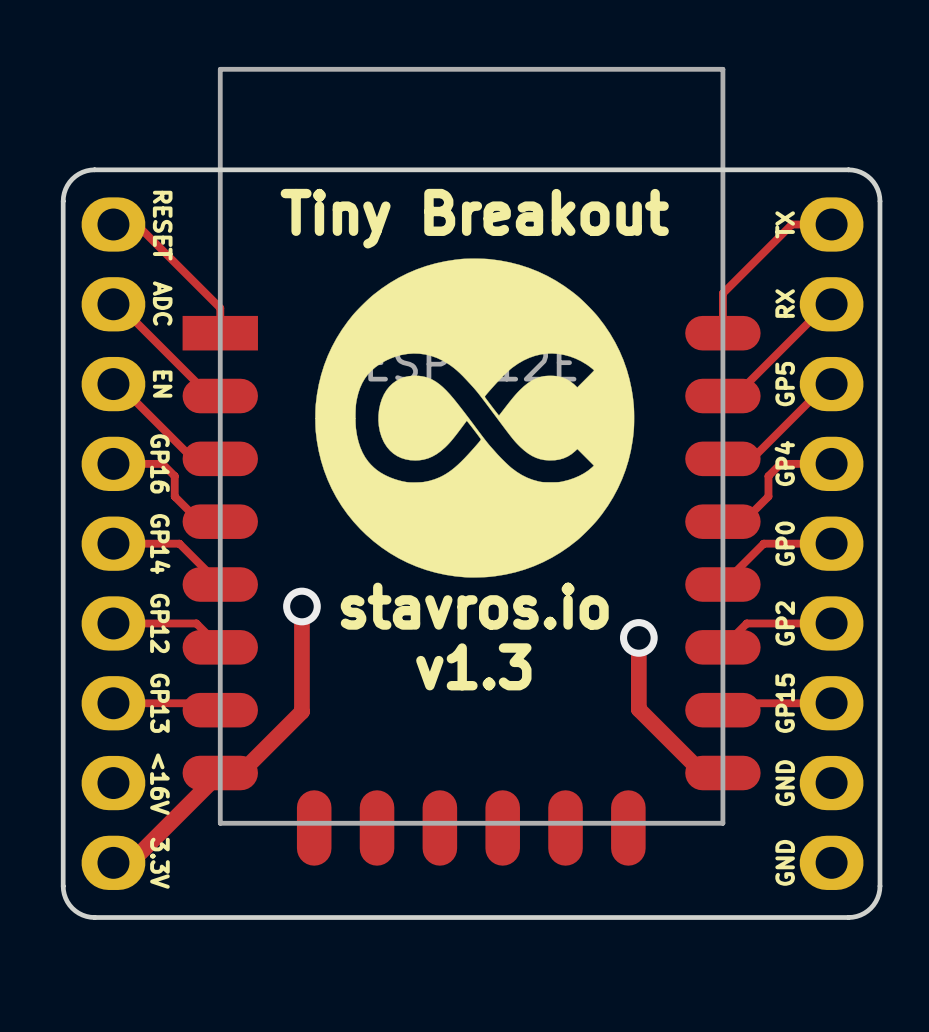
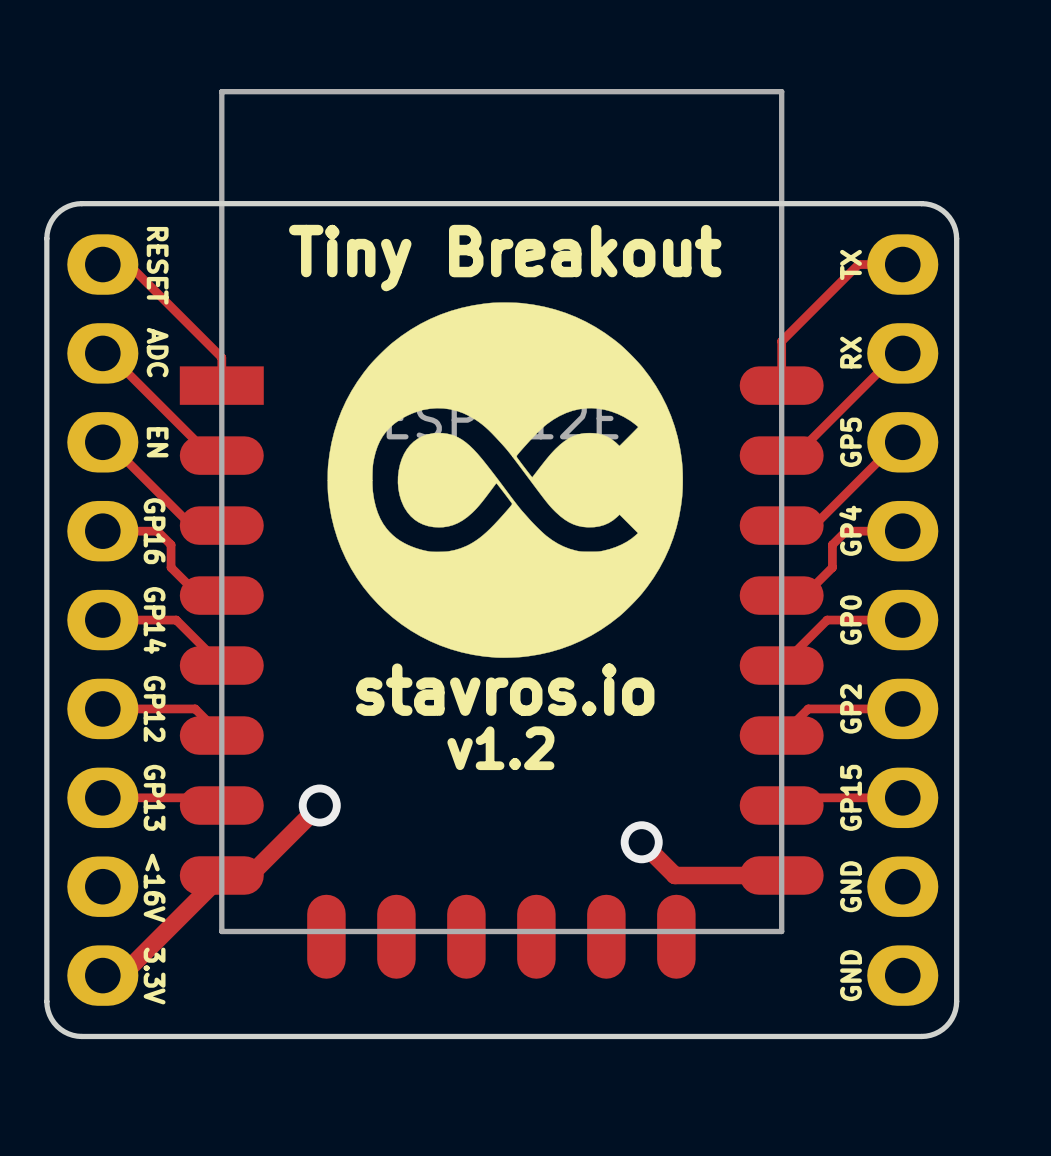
track: (301, 606) (301, 711) (240, 773) -> (319, 805) (249, 875) (244, 875)
via position: (301, 606) -> (319, 805)
track: (638, 637) (638, 709) (702, 773) -> (641, 842) (674, 875) (758, 875)
via position: (638, 637) -> (641, 842)
text: v1.3 (473, 666) -> v1.2 (500, 748)

